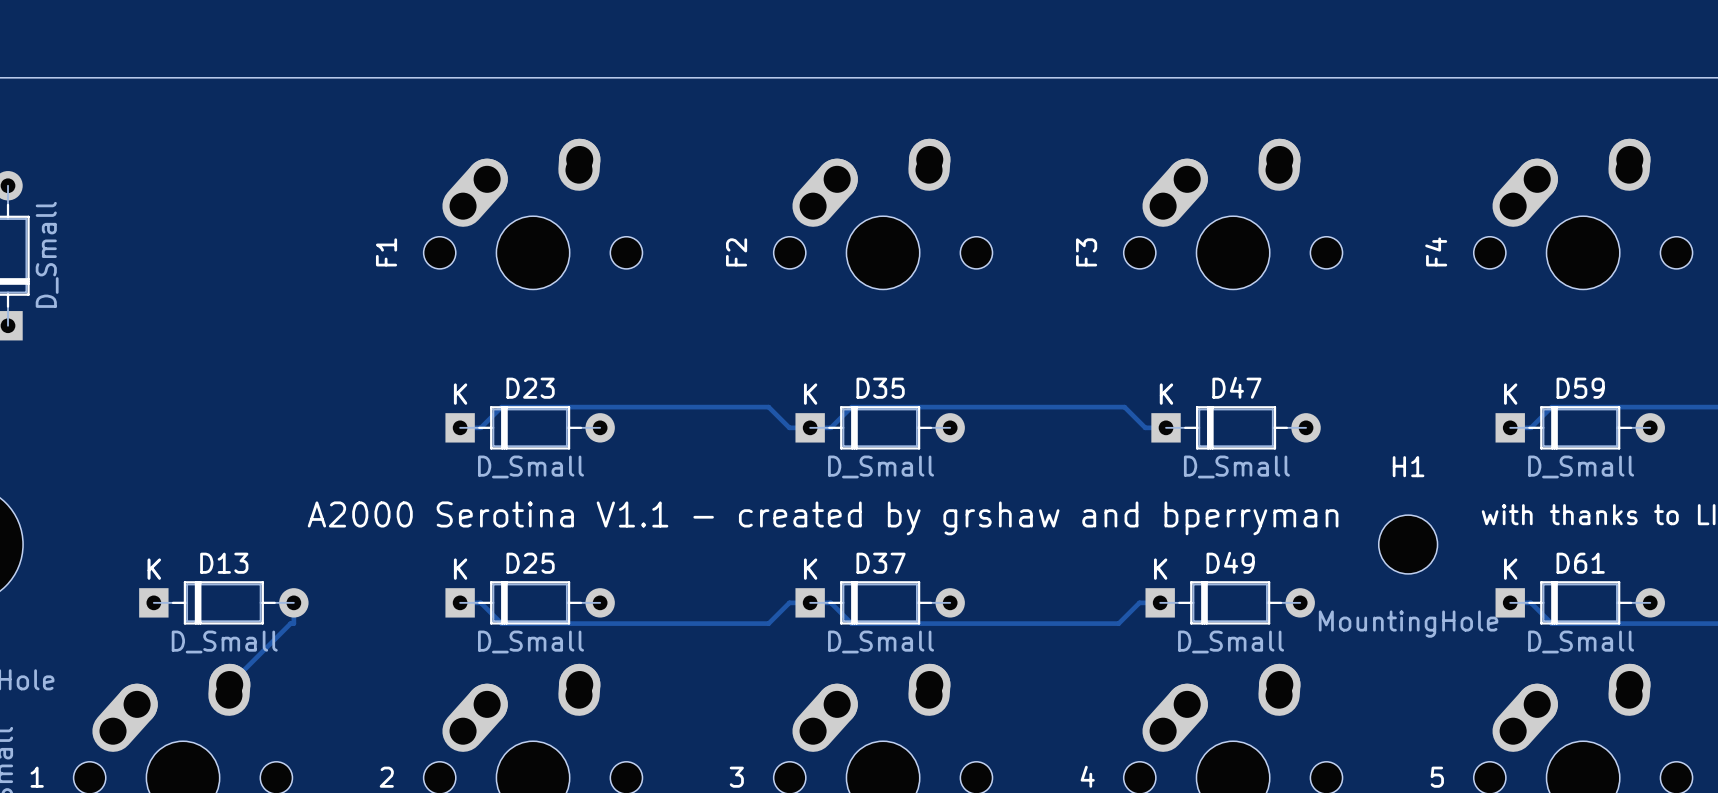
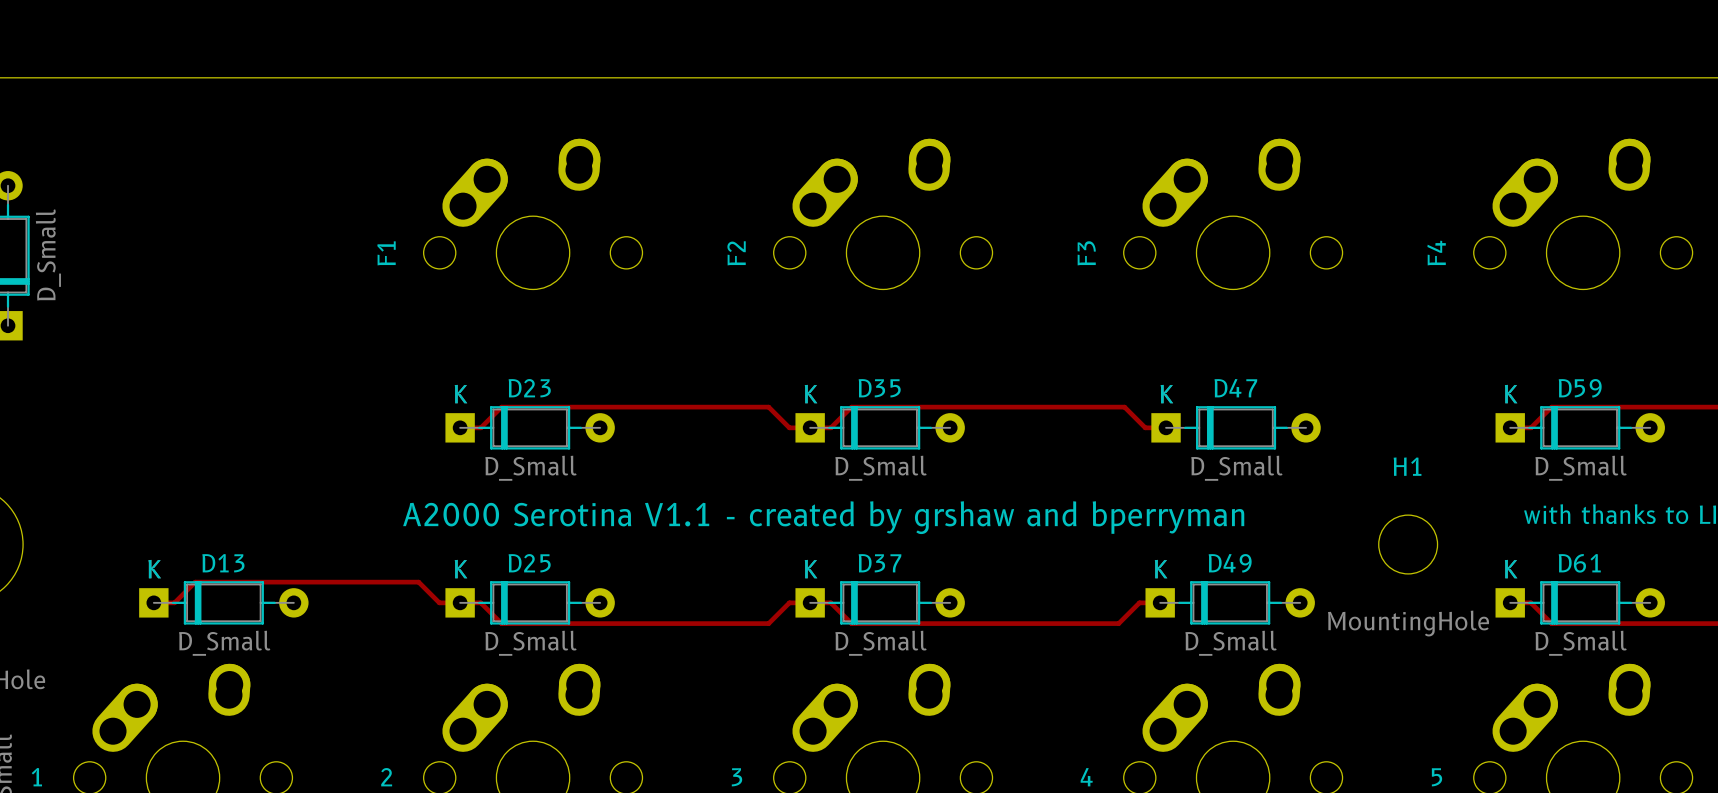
track: none -> (153, 602) (174, 602) (195, 582) (418, 582) (439, 602) (460, 602)
track: (293, 602) (293, 623) (290, 623) (229, 684) -> none

